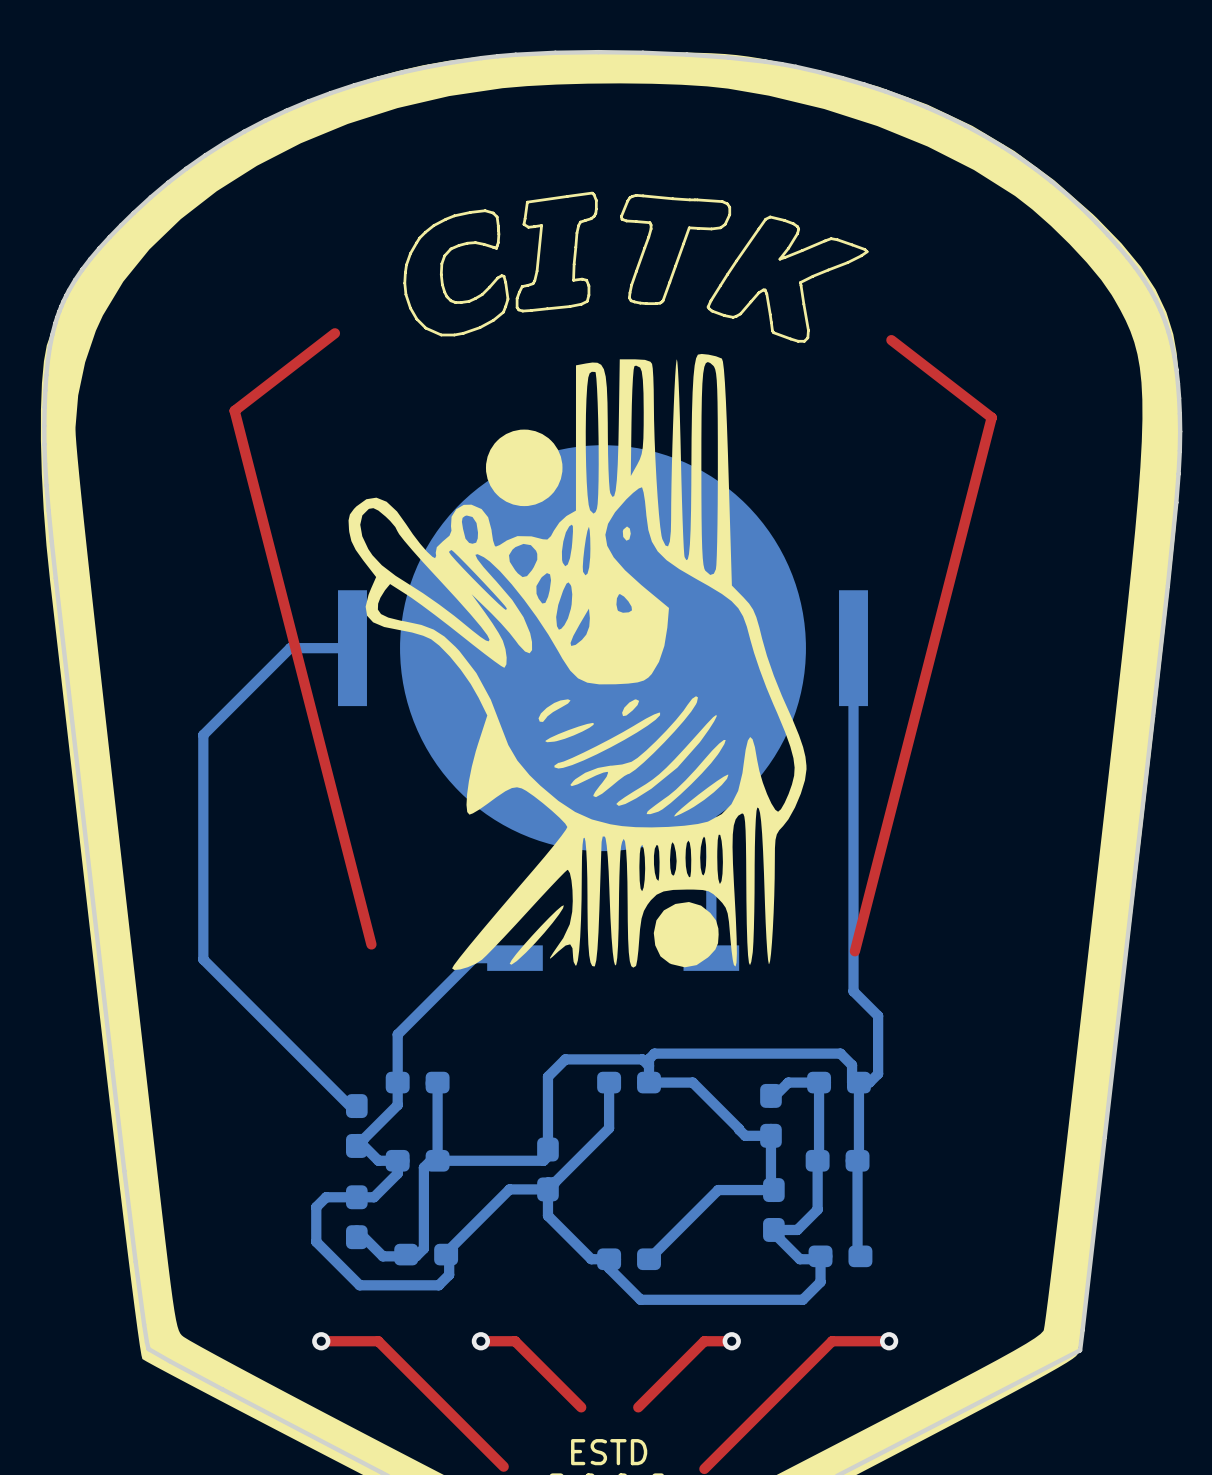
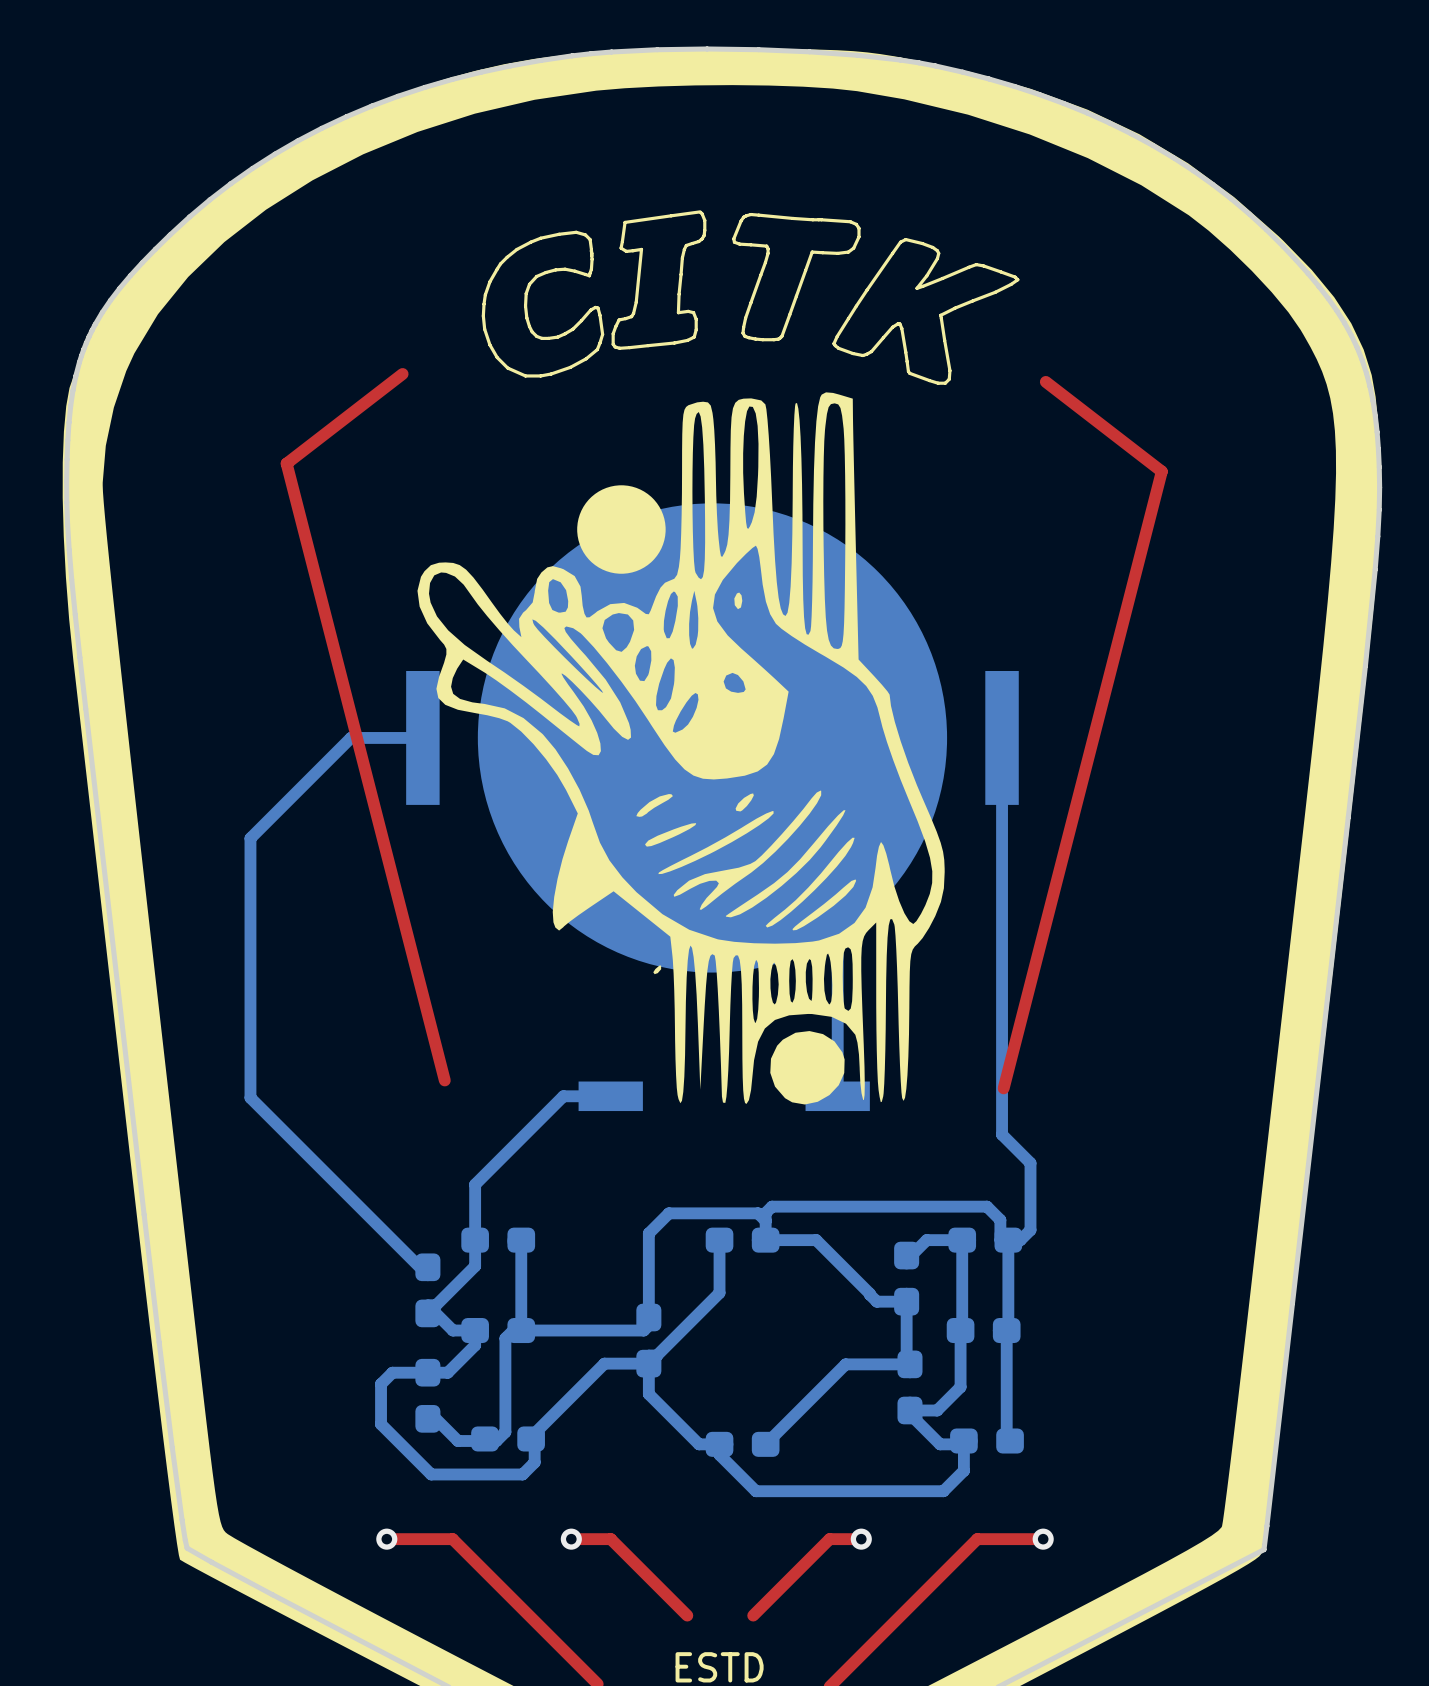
drawing shape: [348, 353, 807, 971] -> [417, 392, 945, 1105]

